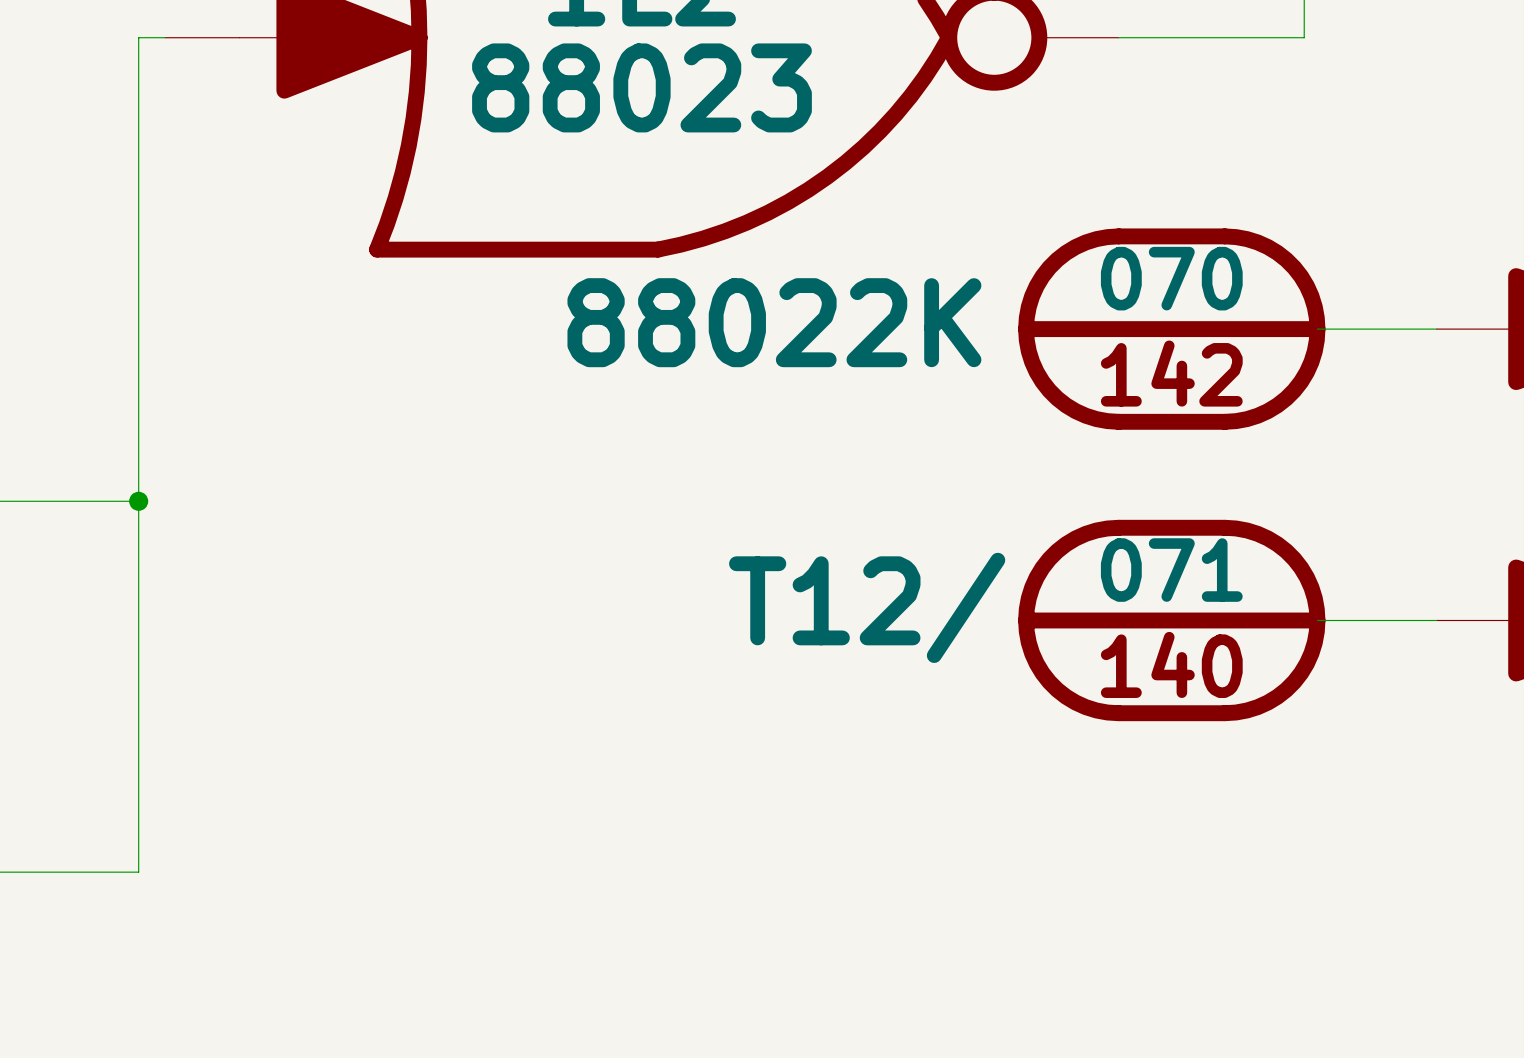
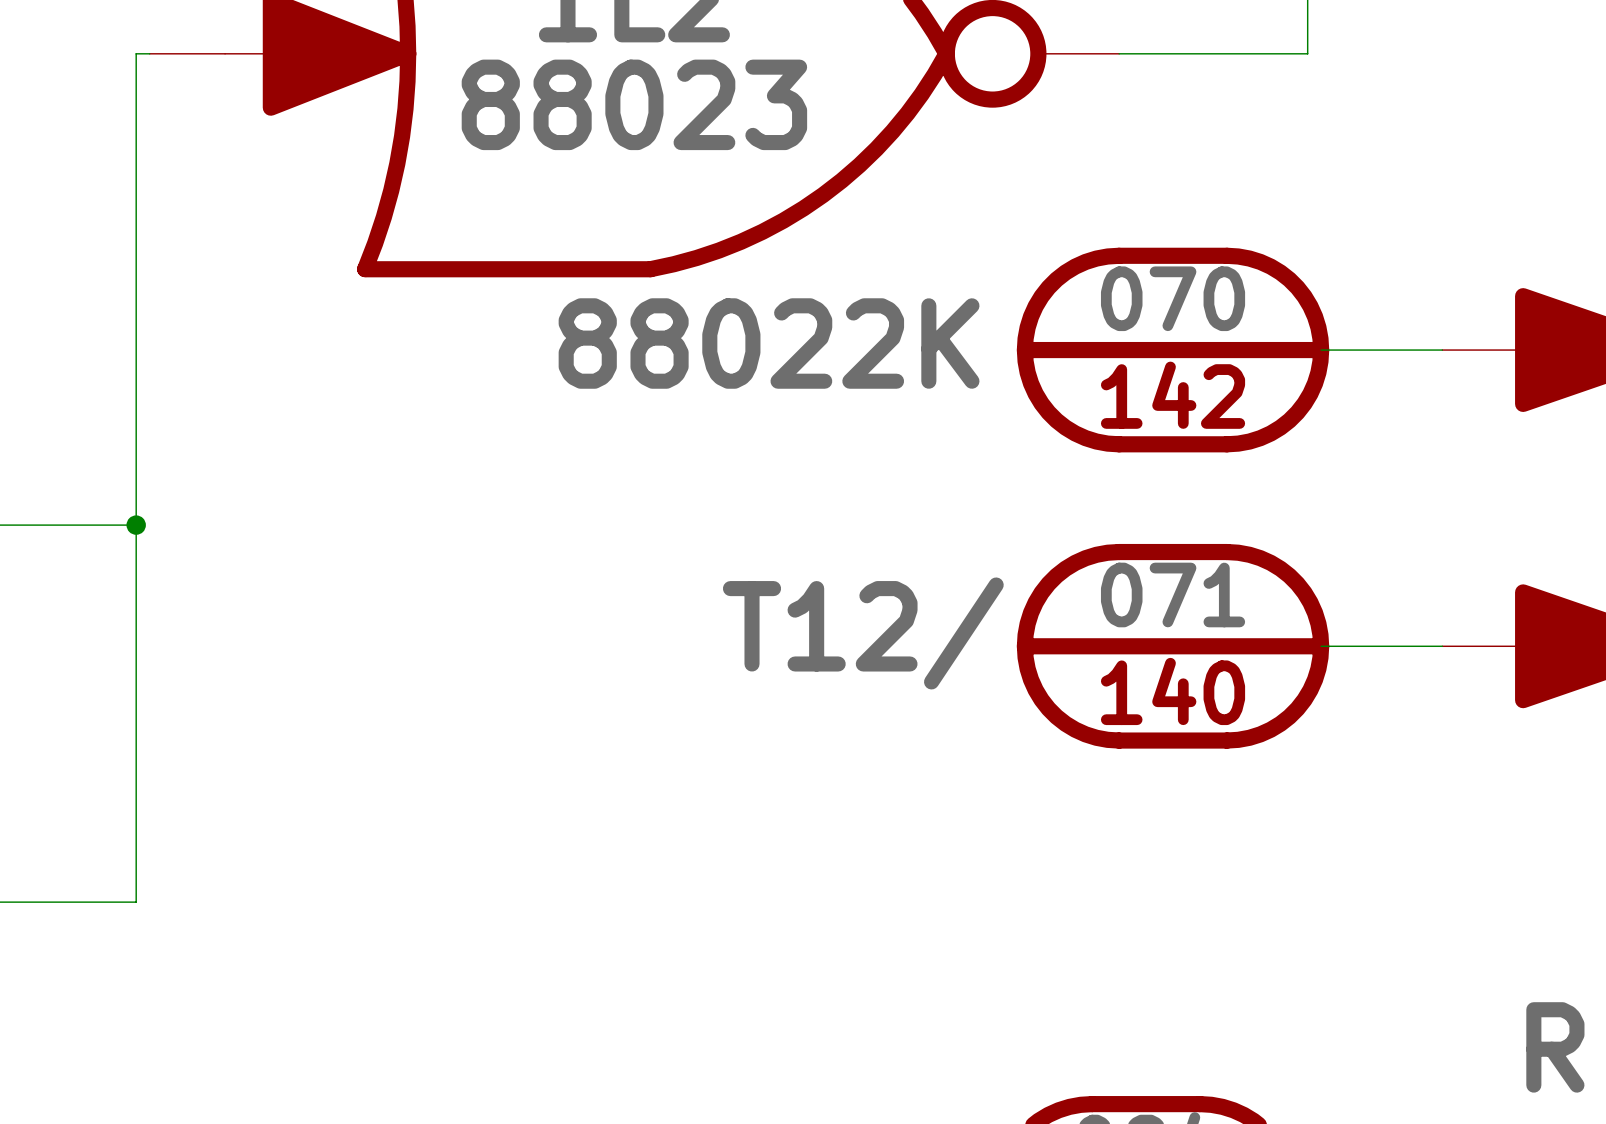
wire: (151, 37) (138, 37) (138, 872) -> (136, 53) (136, 902) (122, 902)
junction position: (138, 501) -> (136, 525)

